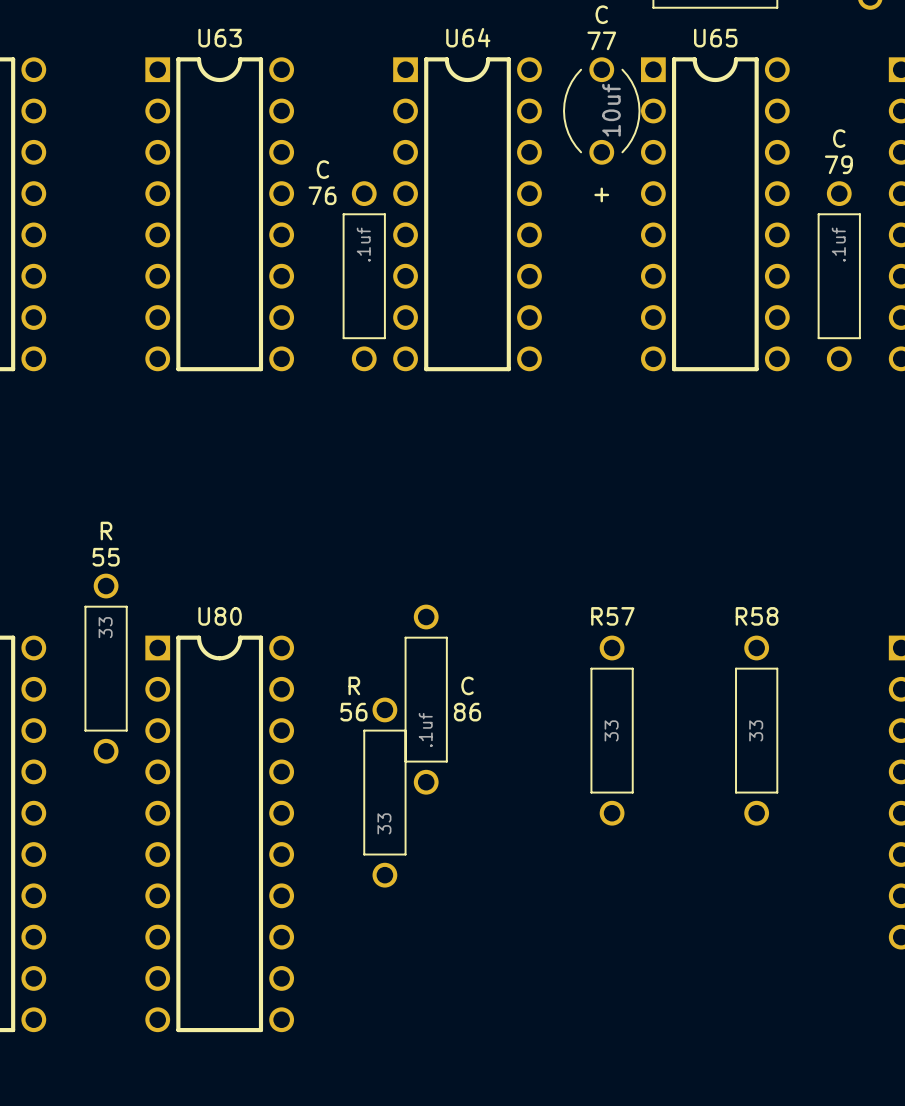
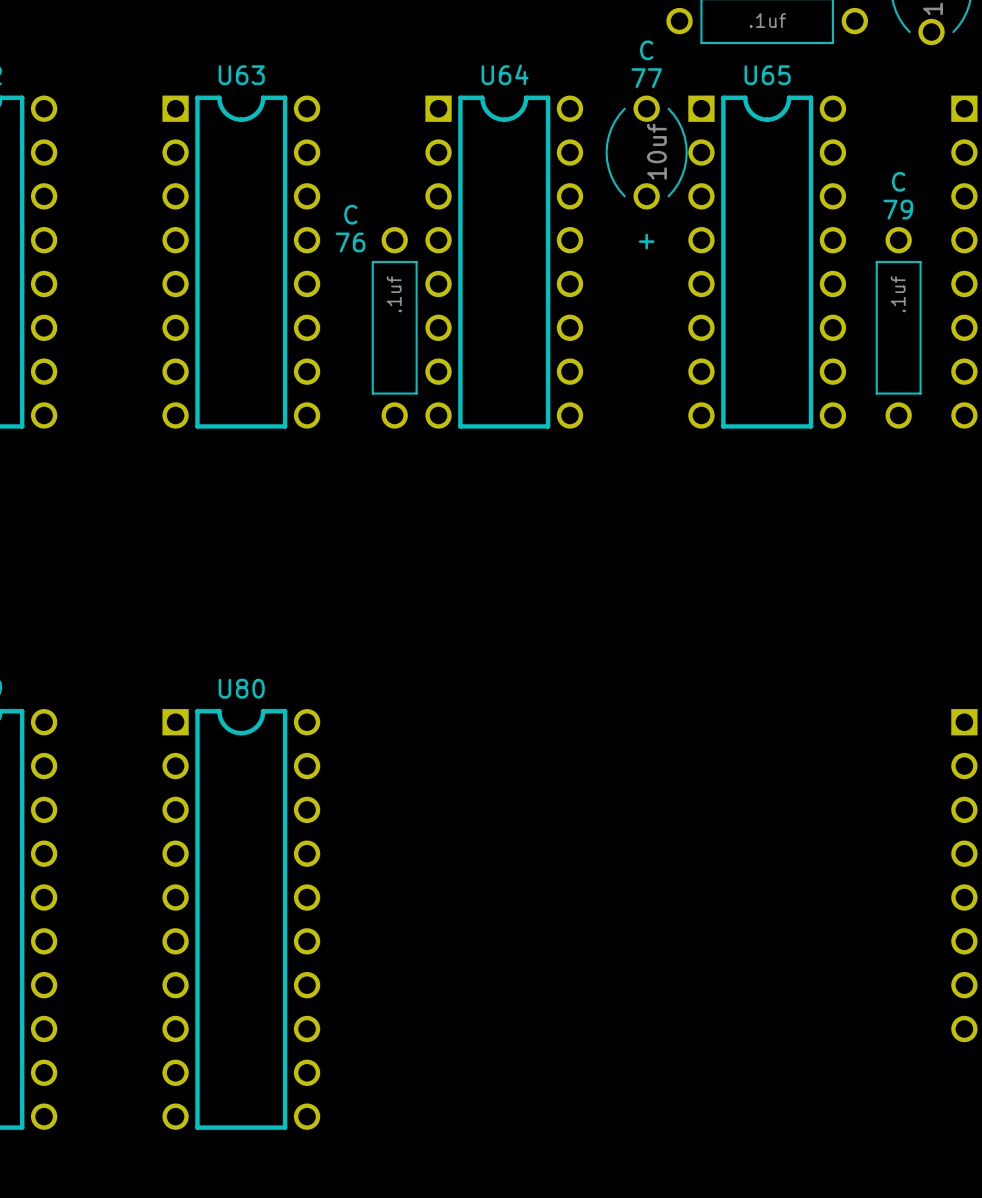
text: R (106, 531) -> none
text: 55 (106, 557) -> none
part: 33 (106, 668) -> none
text: R (354, 685) -> none
text: C (467, 685) -> none
part: .1uf (426, 699) -> none
text: 56 (353, 712) -> none
text: 86 (467, 712) -> none
R57: 33 (612, 730) -> none
R58: 33 (756, 730) -> none
part: 33 (384, 792) -> none

